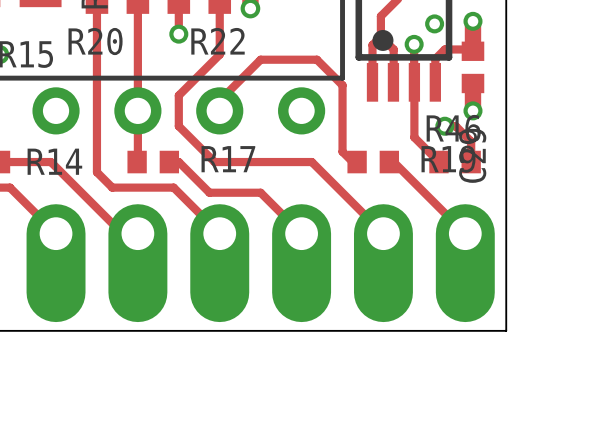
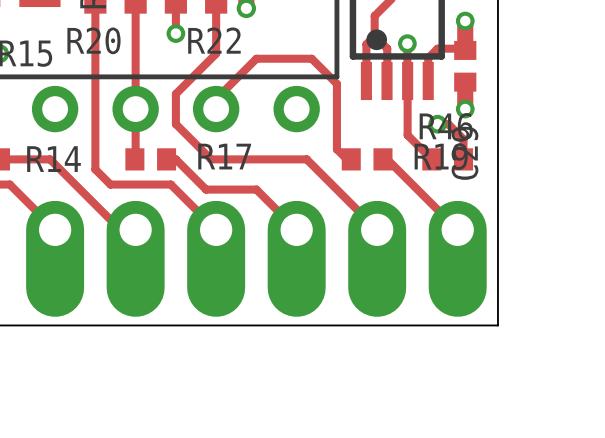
via: (434, 23) -> none

